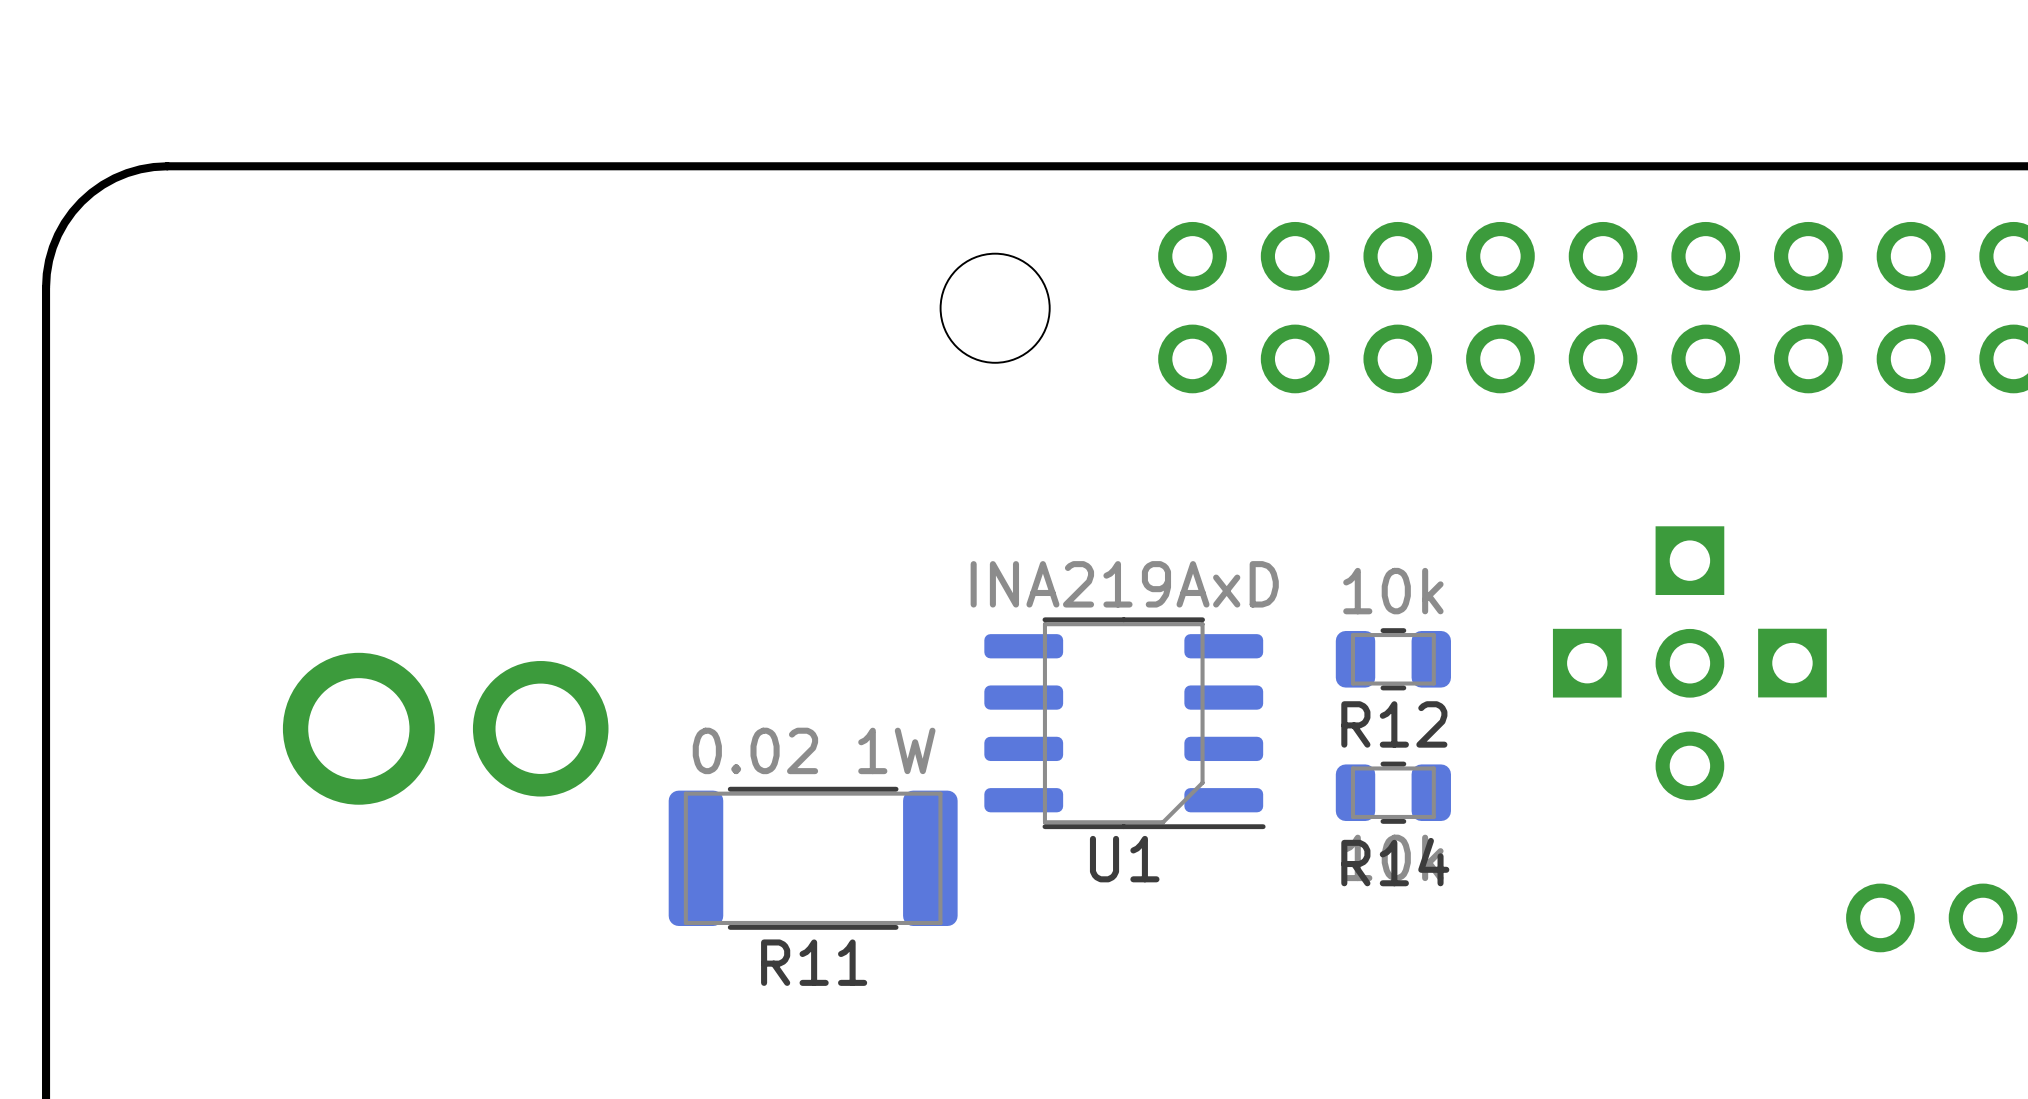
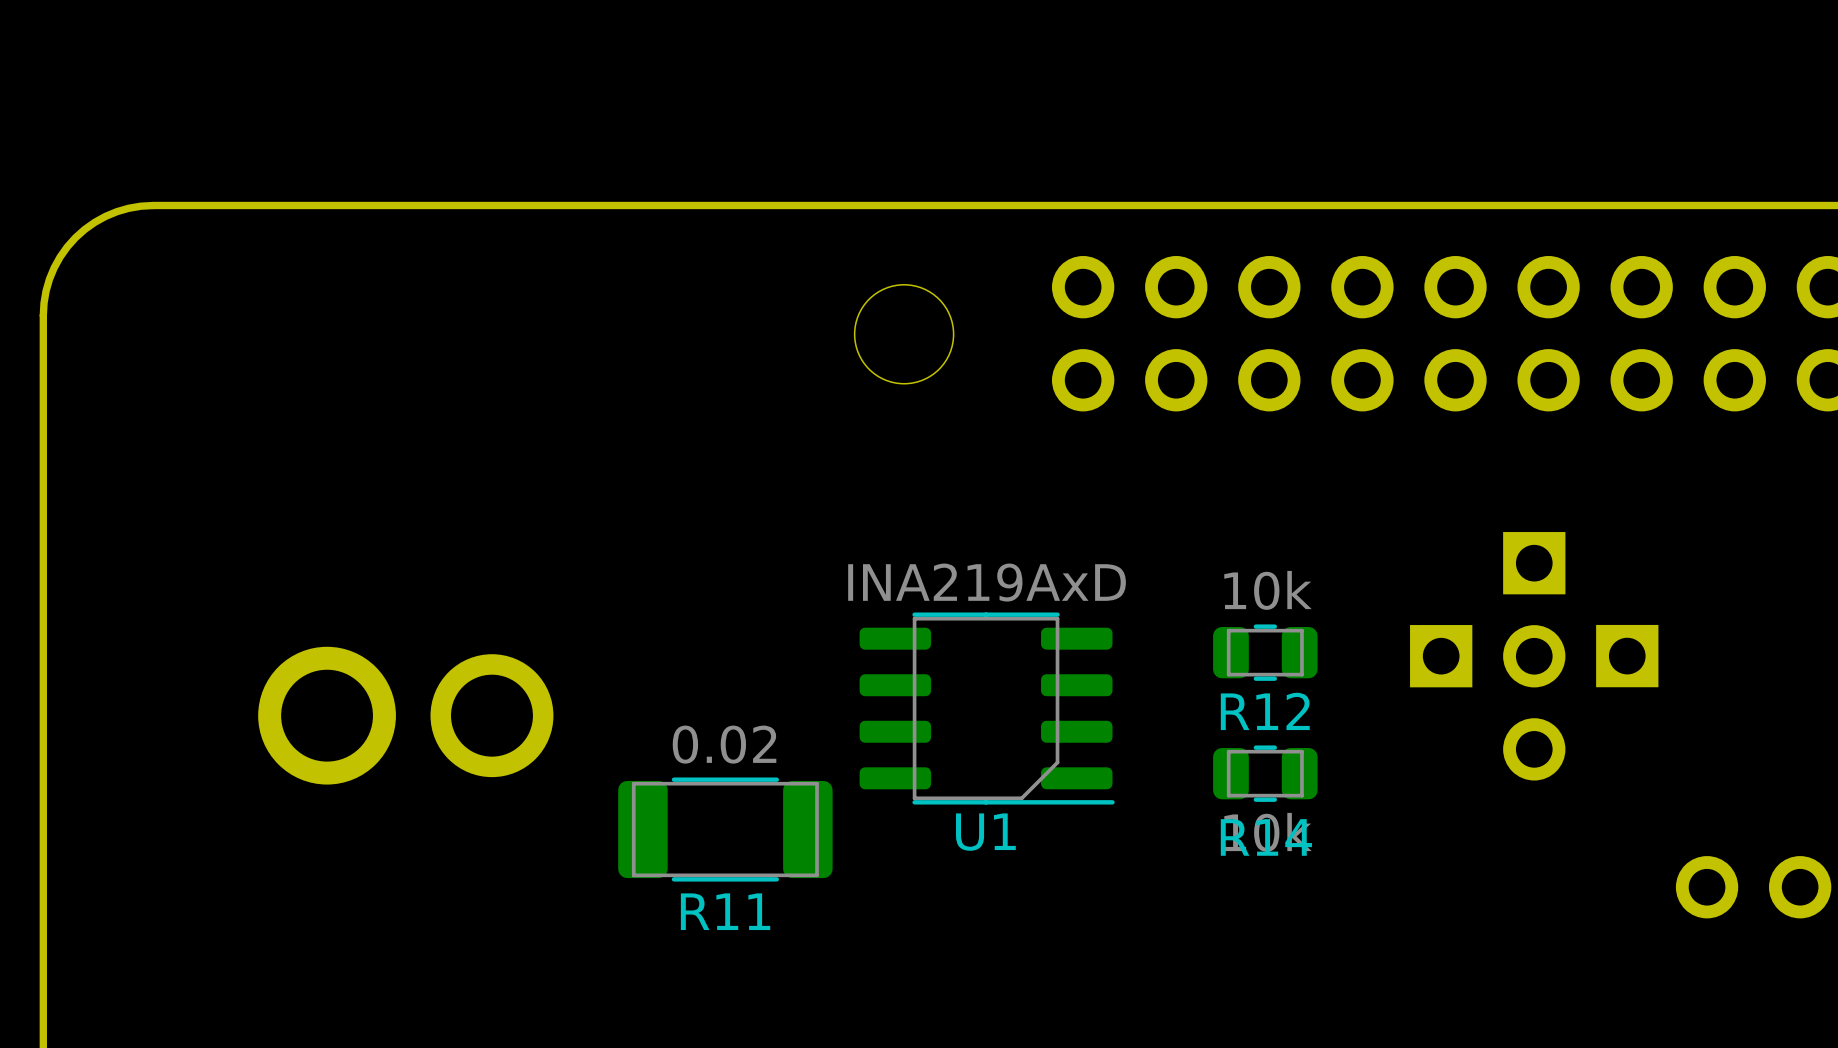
U1 position: (1124, 723) -> (987, 708)
R11 value: 0.02 1W (814, 750) -> 0.02 (724, 744)
R11 footprint: [668, 786, 958, 930] -> [618, 777, 833, 882]

